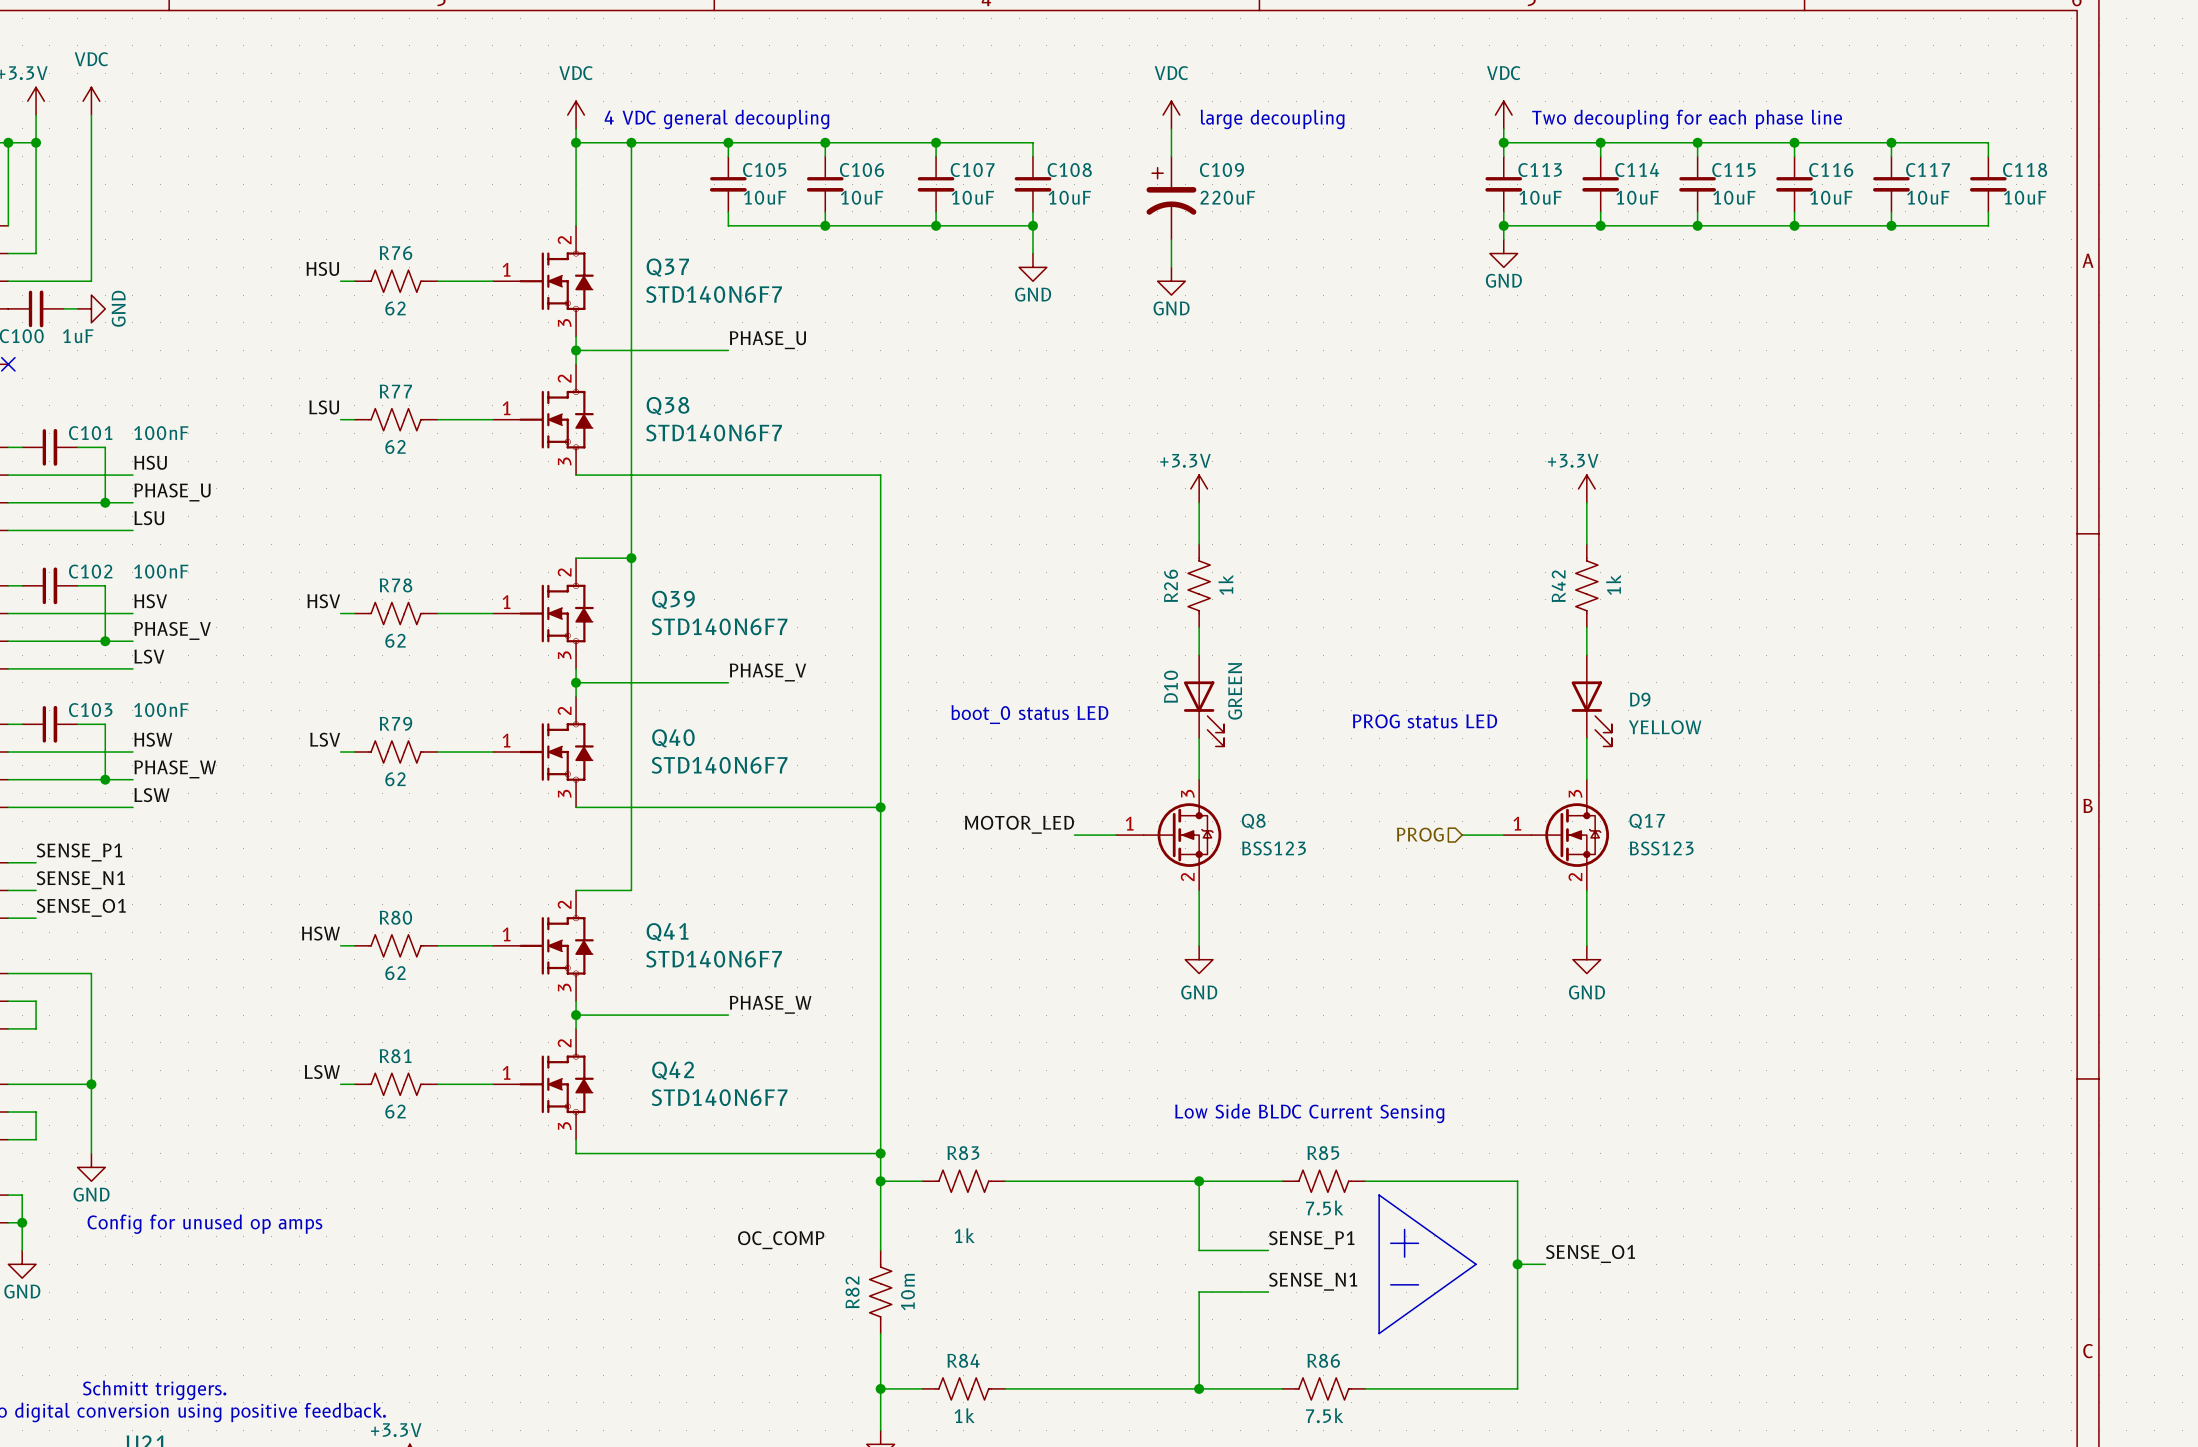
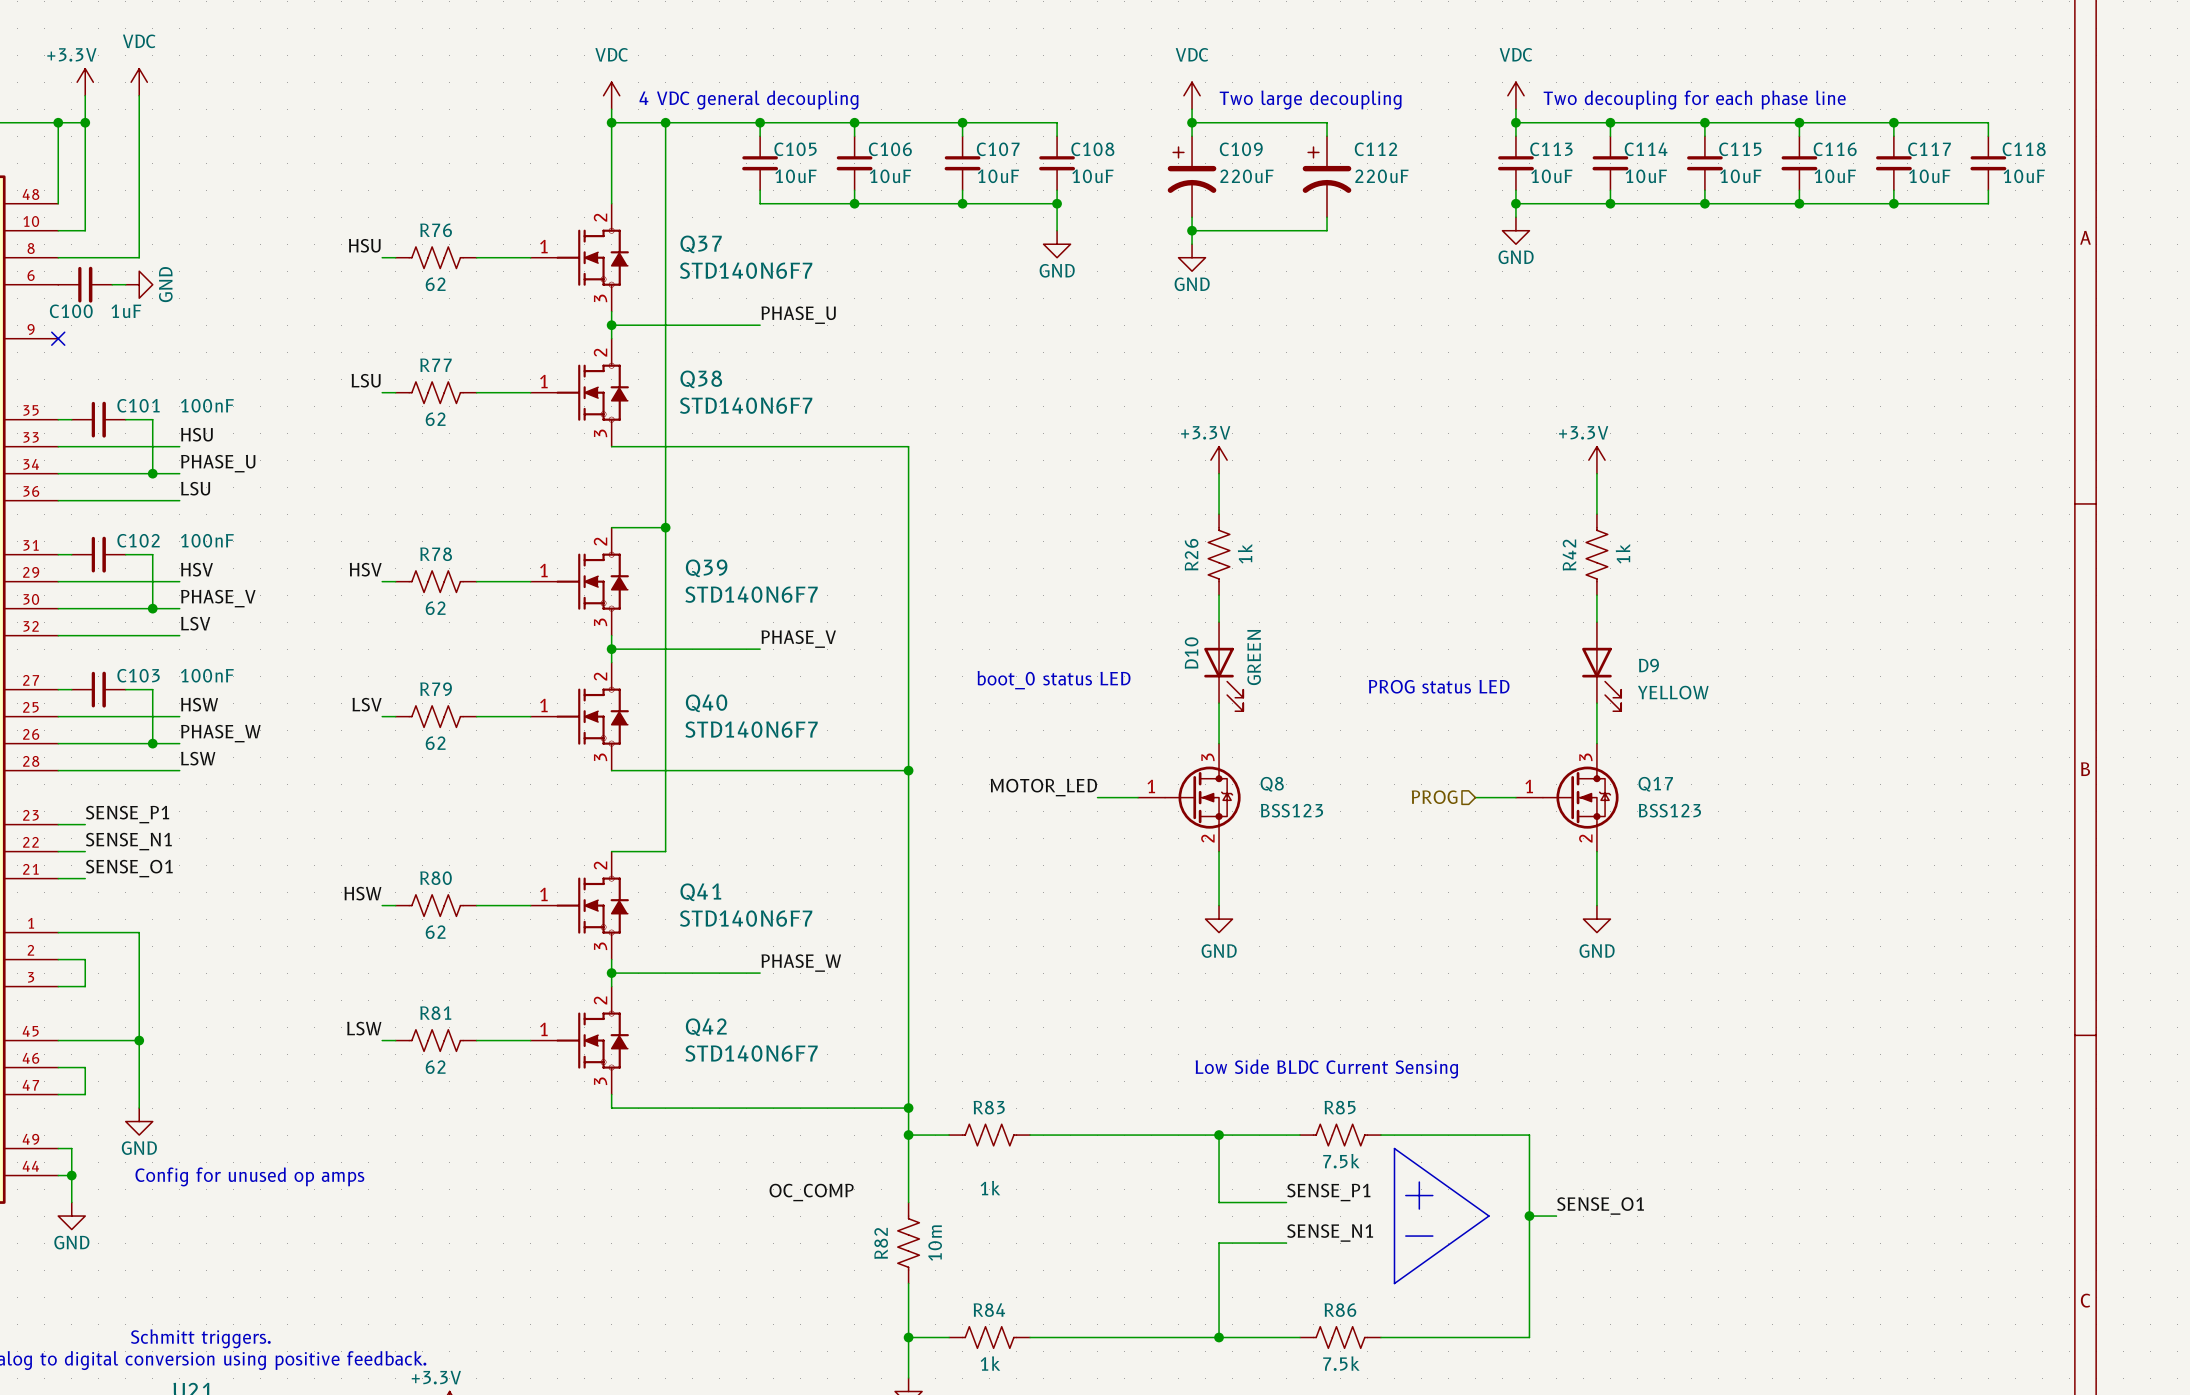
text: large decoupling (1272, 119) -> Two large decoupling (1310, 100)
wire: none -> (1192, 122) (1327, 122) (1327, 136)
junction: none -> (1192, 122)
C112: none -> 220uF (1327, 176)
wire: none -> (1327, 217) (1327, 230) (1192, 230)
junction: none -> (1192, 230)

